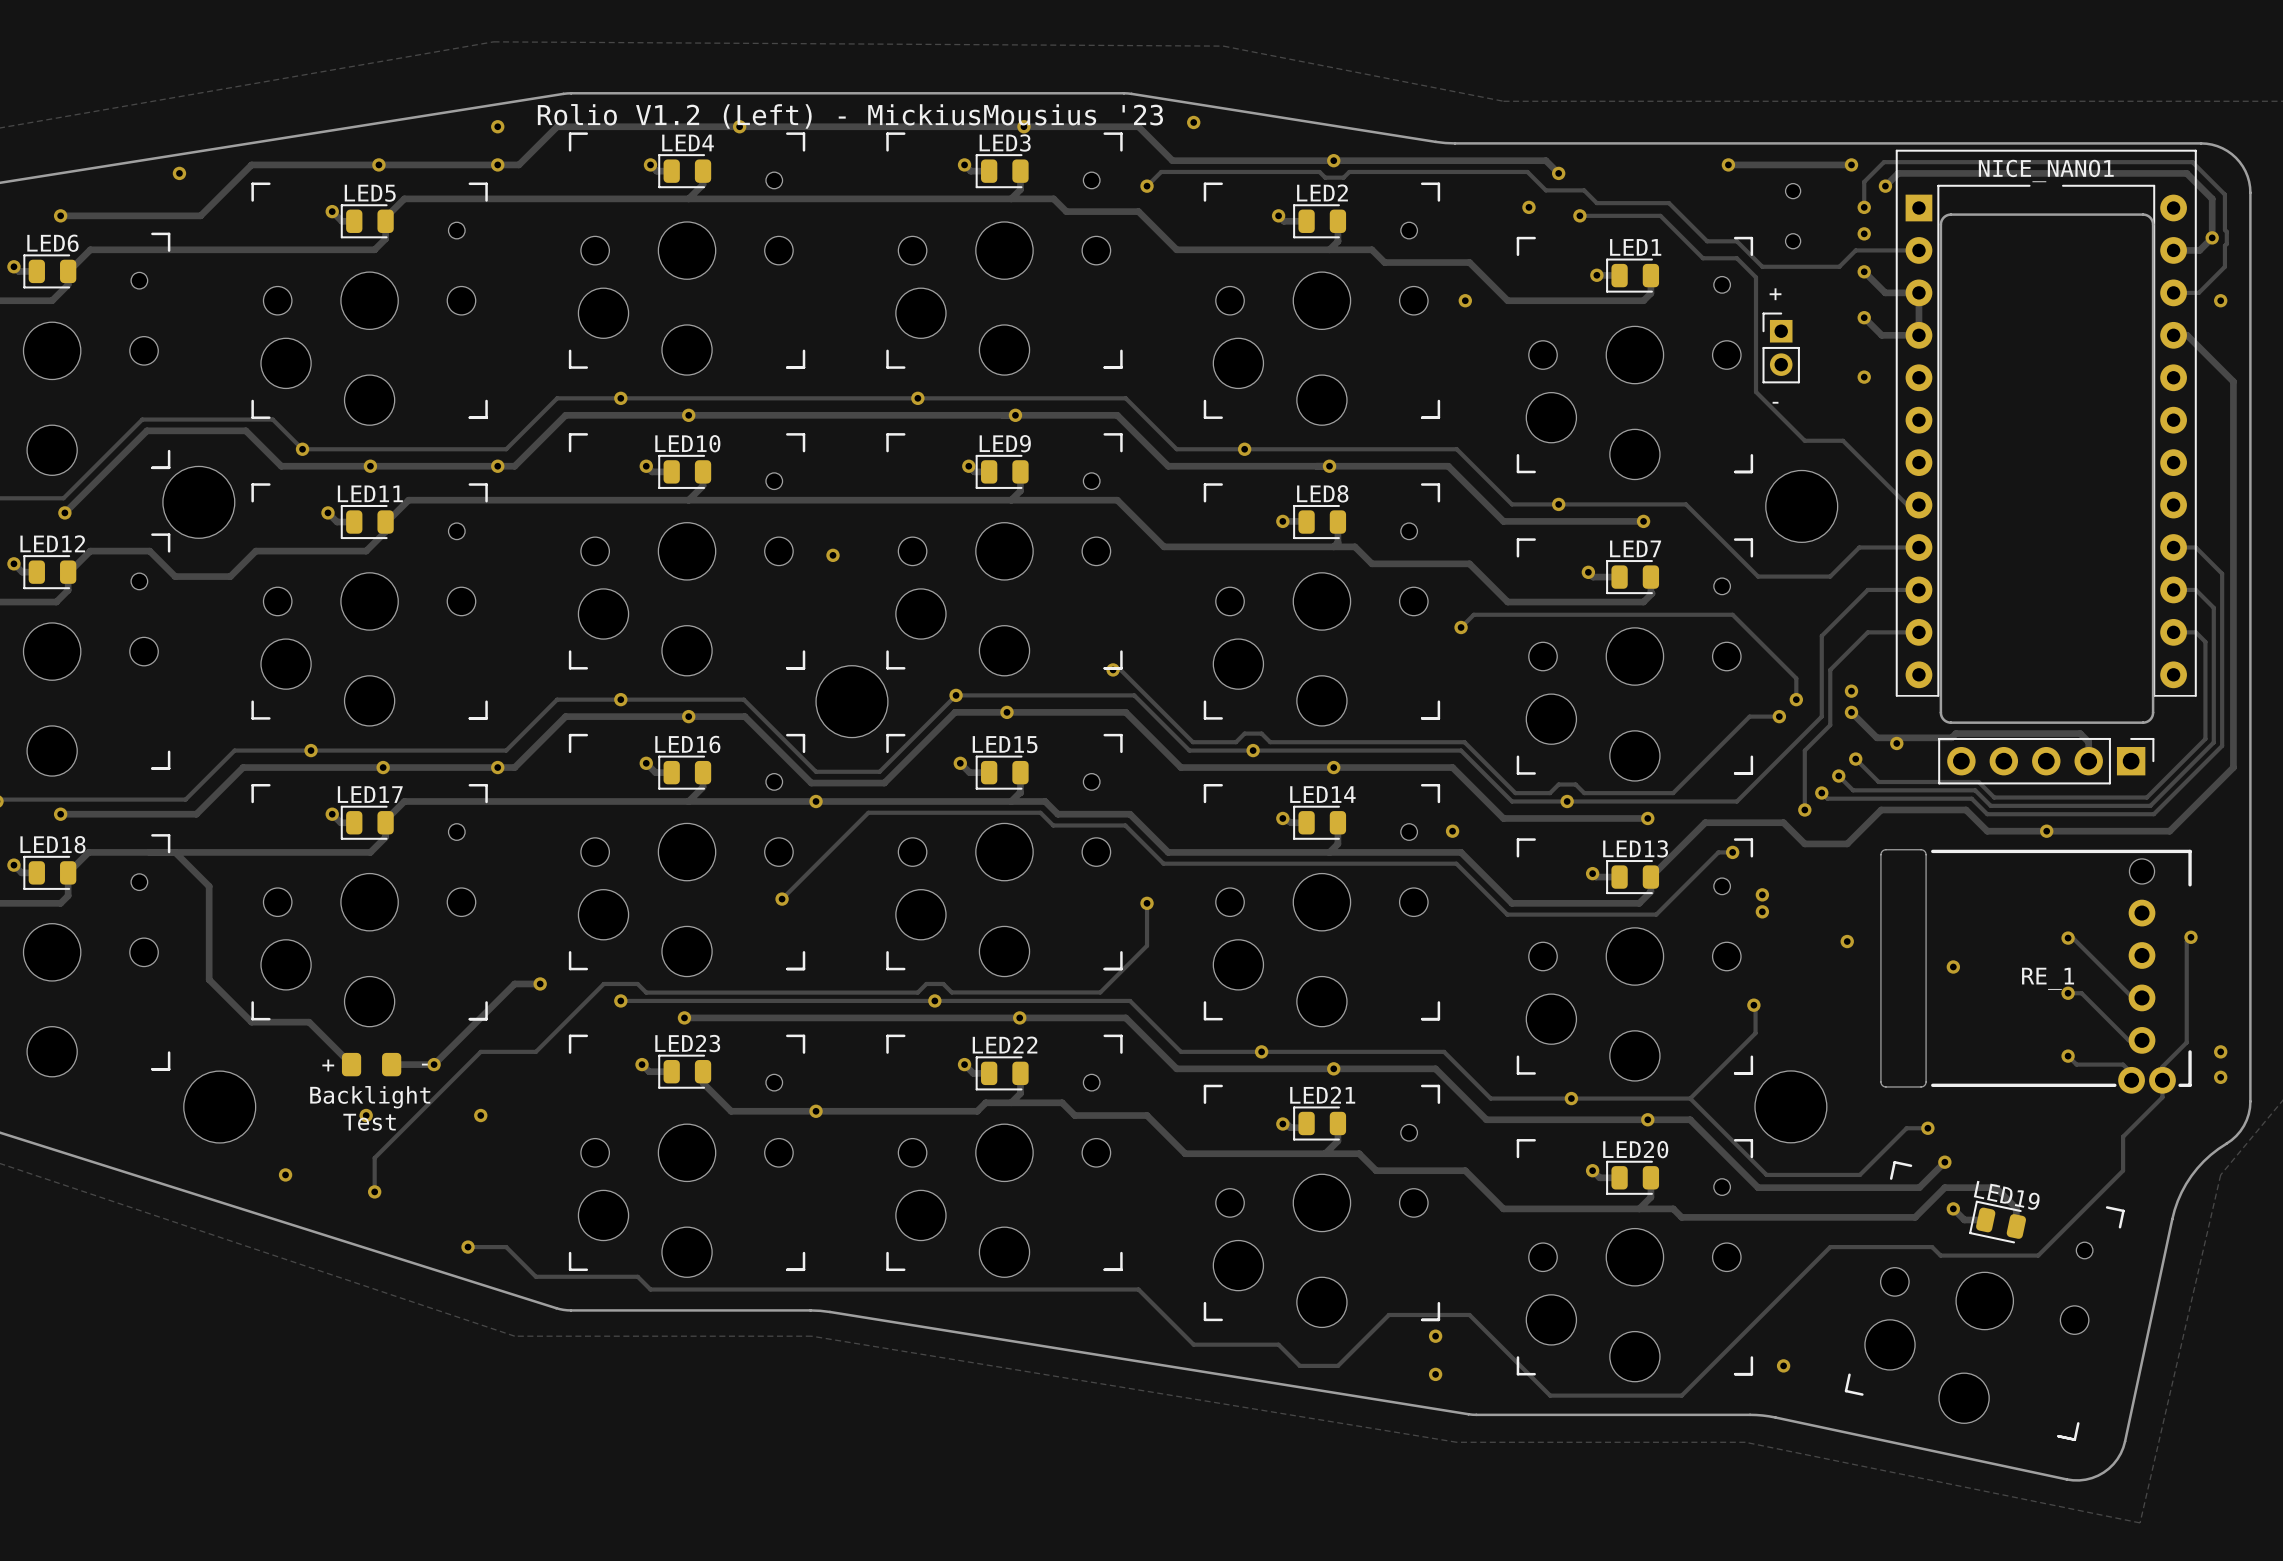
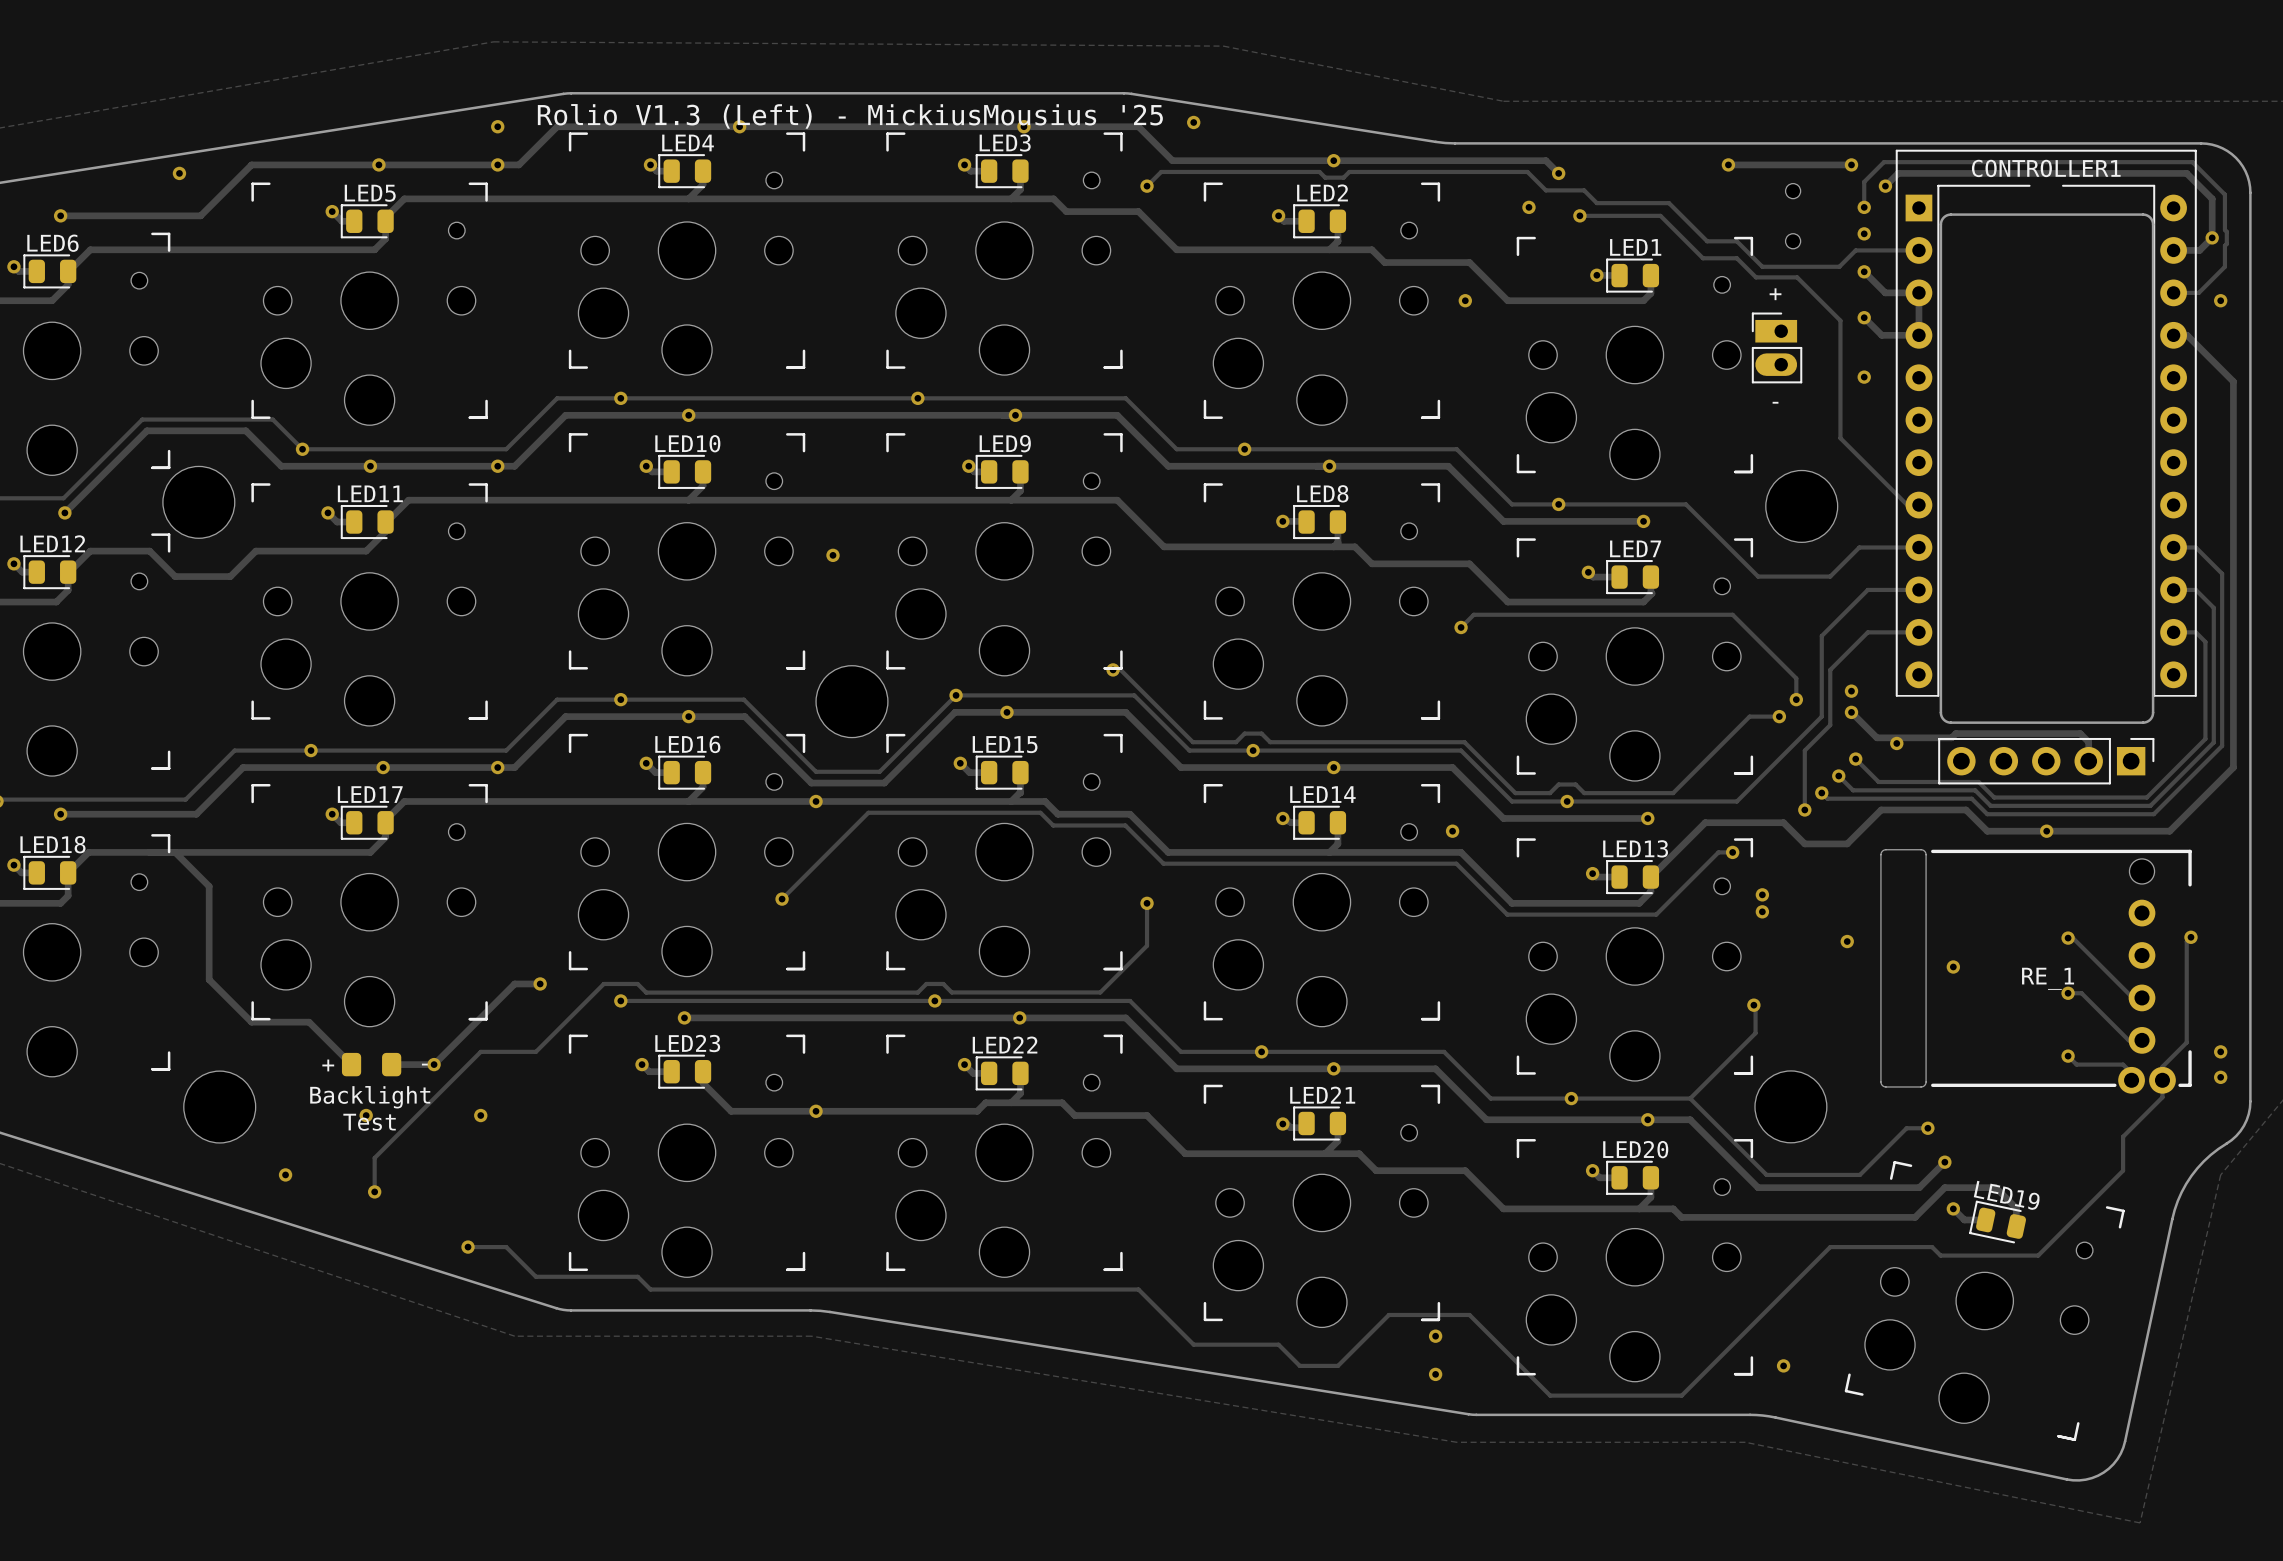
text: Rolio V1.2 (Left) - MickiusMousius '23 (850, 116) -> Rolio V1.3 (Left) - MickiusMousius '25 (850, 116)
NICE_NANO1 name: NICE_NANO1 (2046, 171) -> CONTROLLER1 (2046, 168)
track: (1756, 277) (1756, 391) (1804, 440) (1843, 440) -> (1756, 277) (1797, 277) (1840, 320) (1840, 438) (1843, 440)
part footprint: [1762, 312, 1800, 384] -> [1751, 312, 1803, 384]

